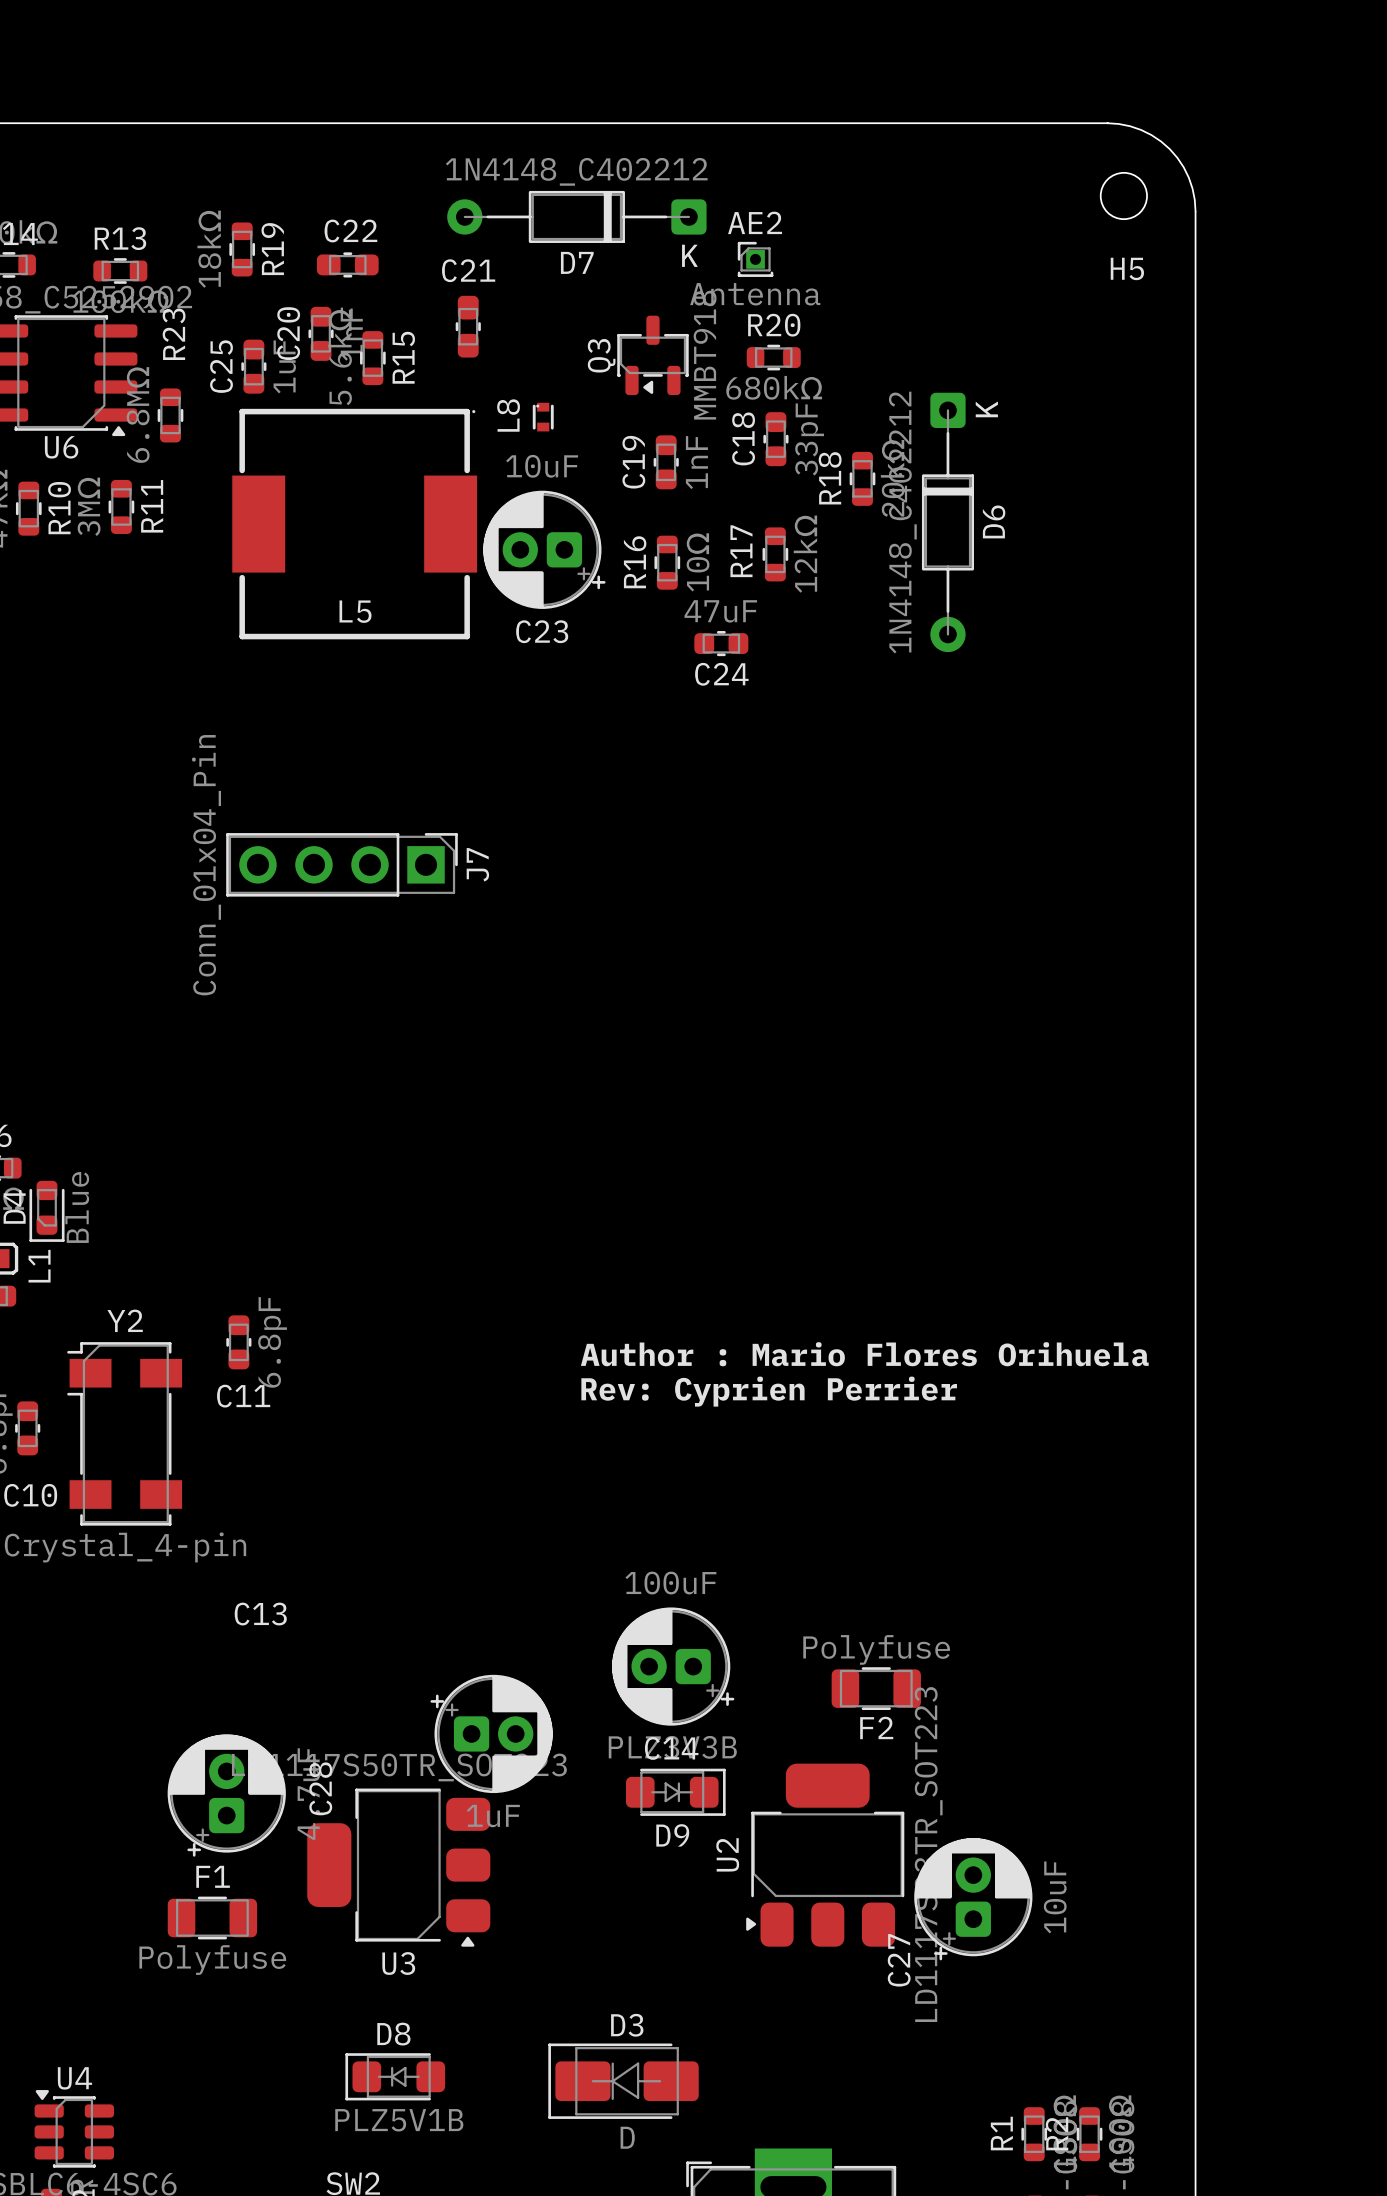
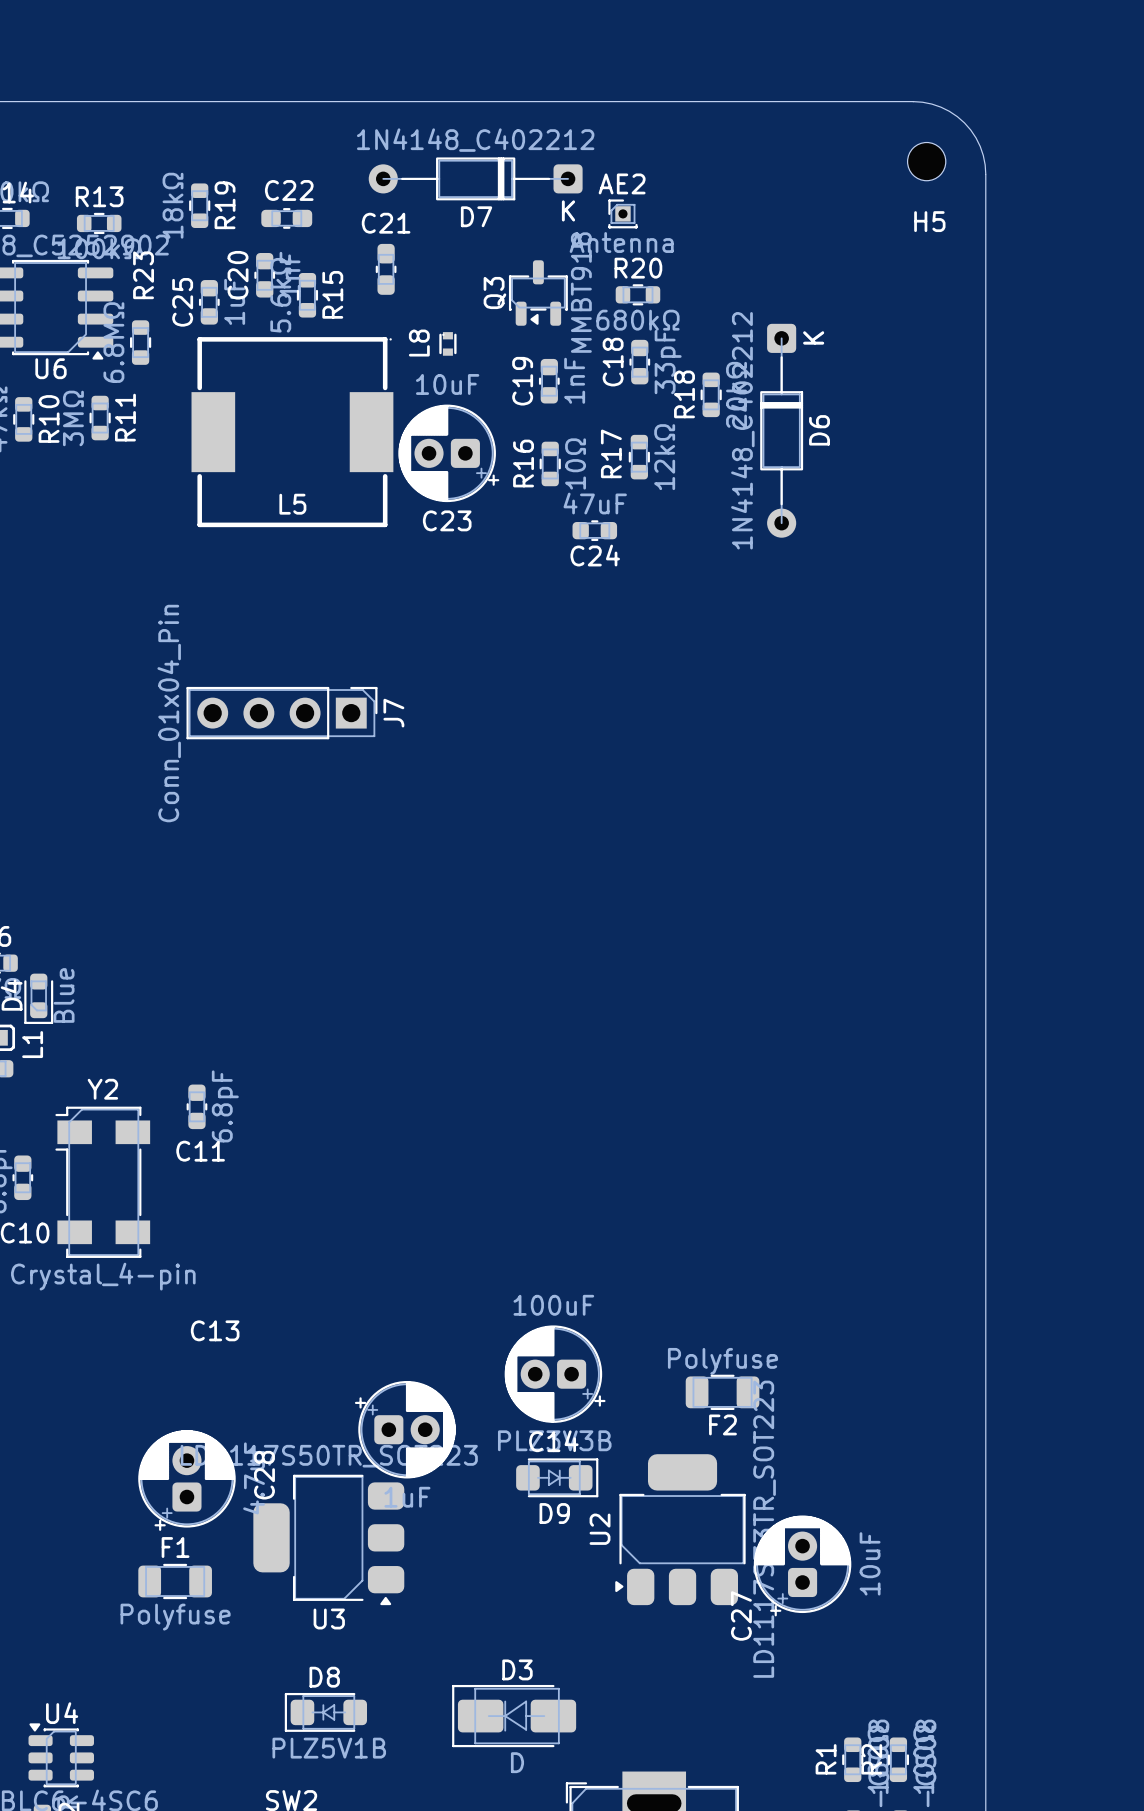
text: Author : Mario Flores Orihuela (864, 1354) -> none
text: Rev: Cyprien Perrier (769, 1391) -> none

